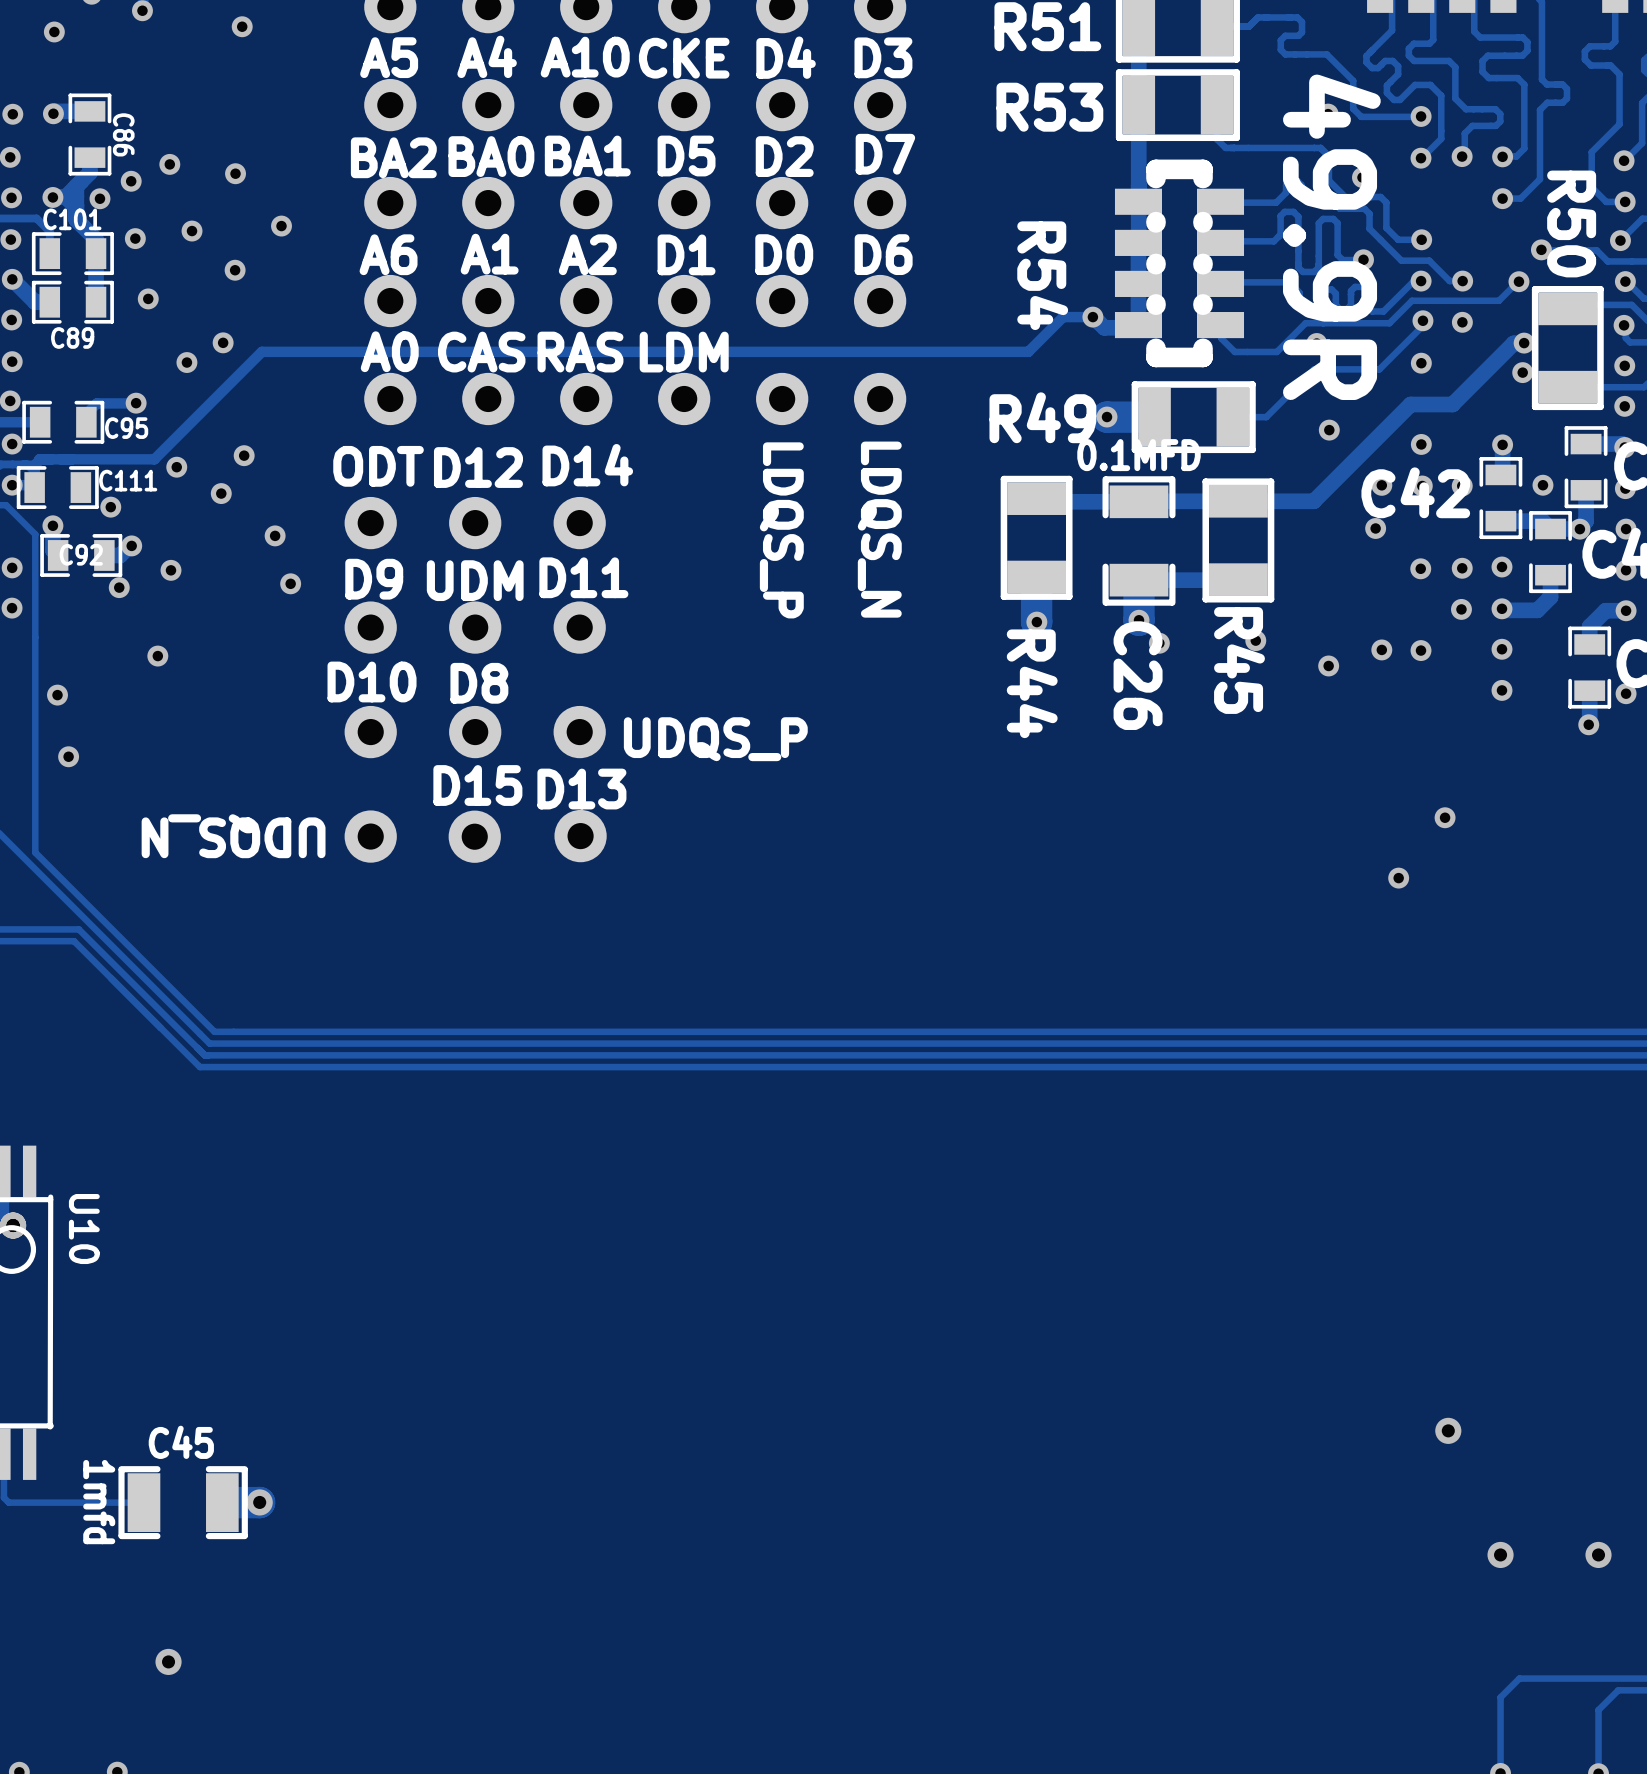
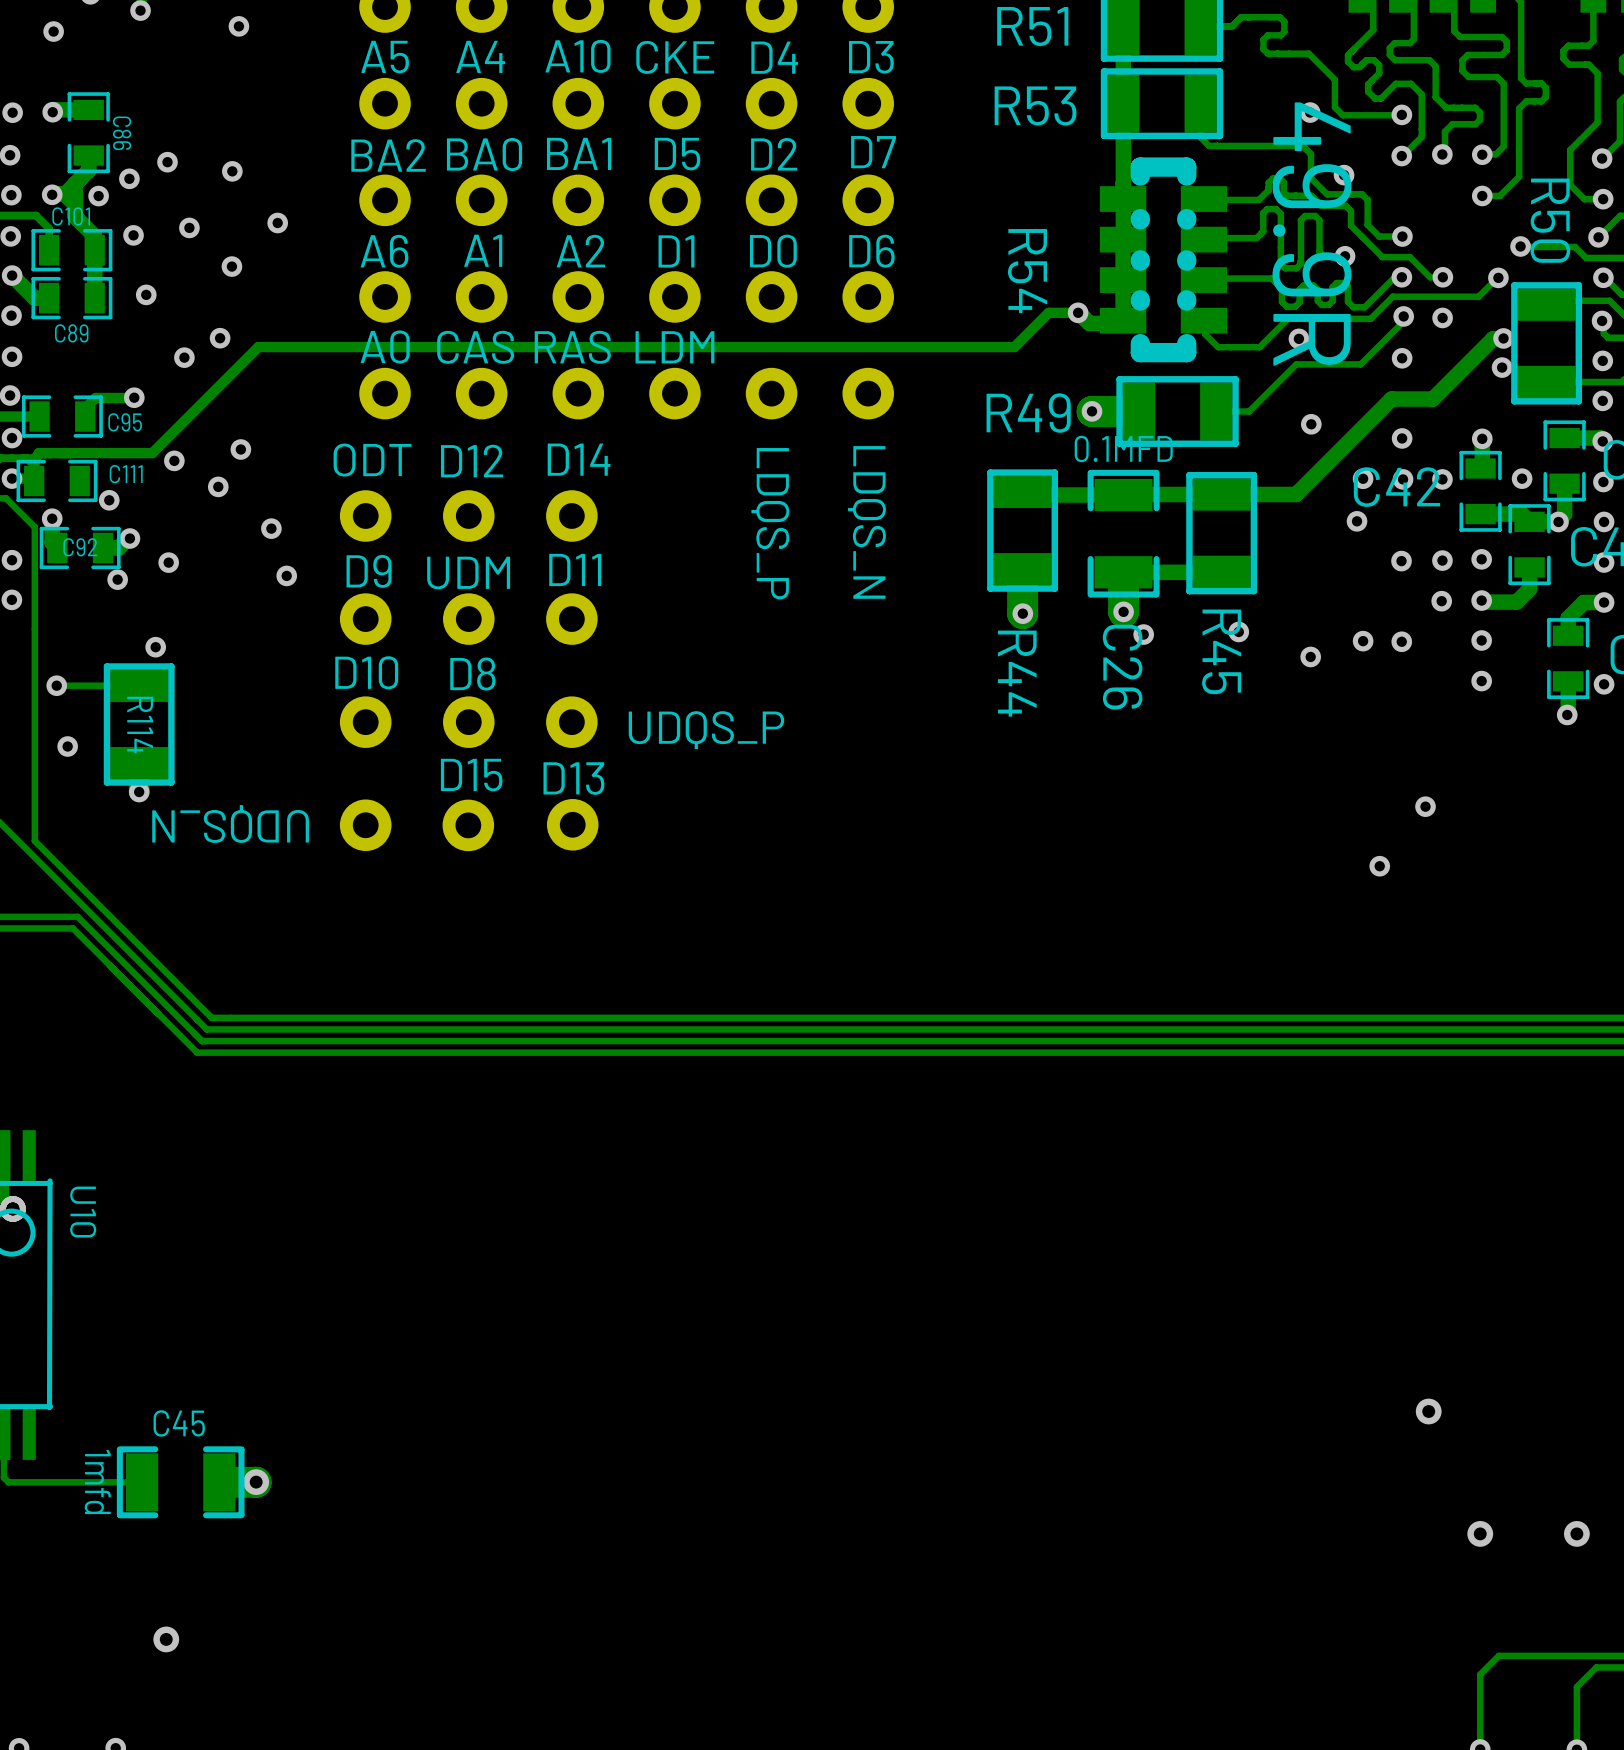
track: none -> (139, 685) (56, 685)
R114: none -> (139, 724)
via: none -> (139, 792)

